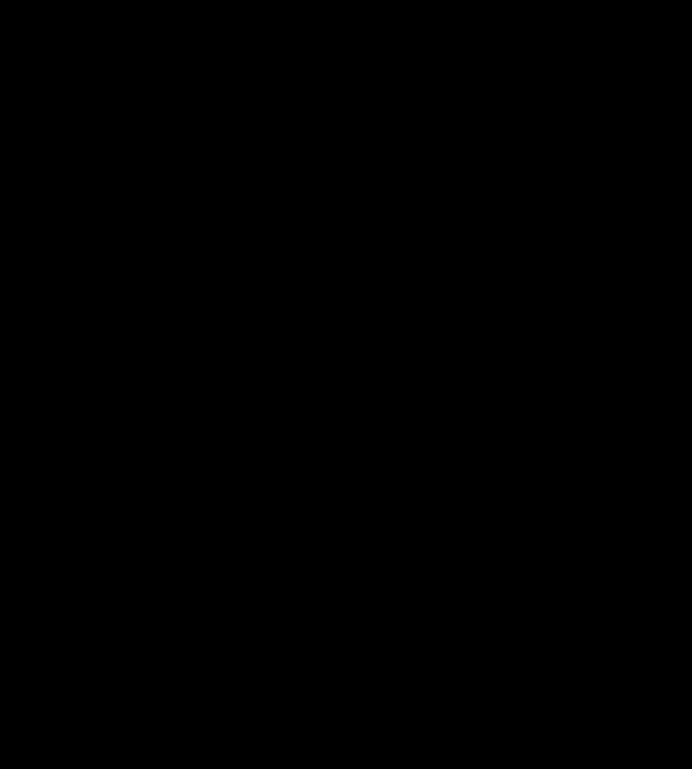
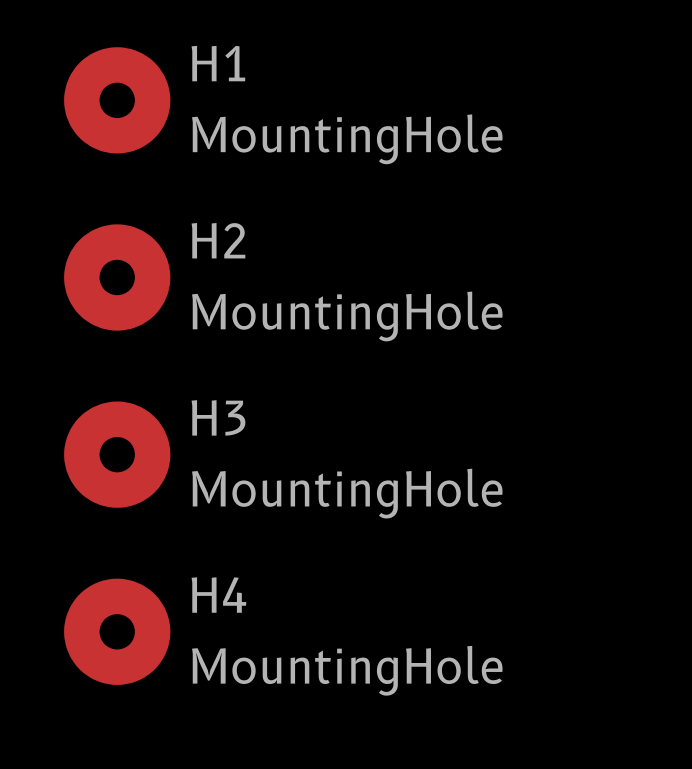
H1: none -> MountingHole (117, 100)
H2: none -> MountingHole (117, 277)
H3: none -> MountingHole (117, 454)
H4: none -> MountingHole (117, 631)

